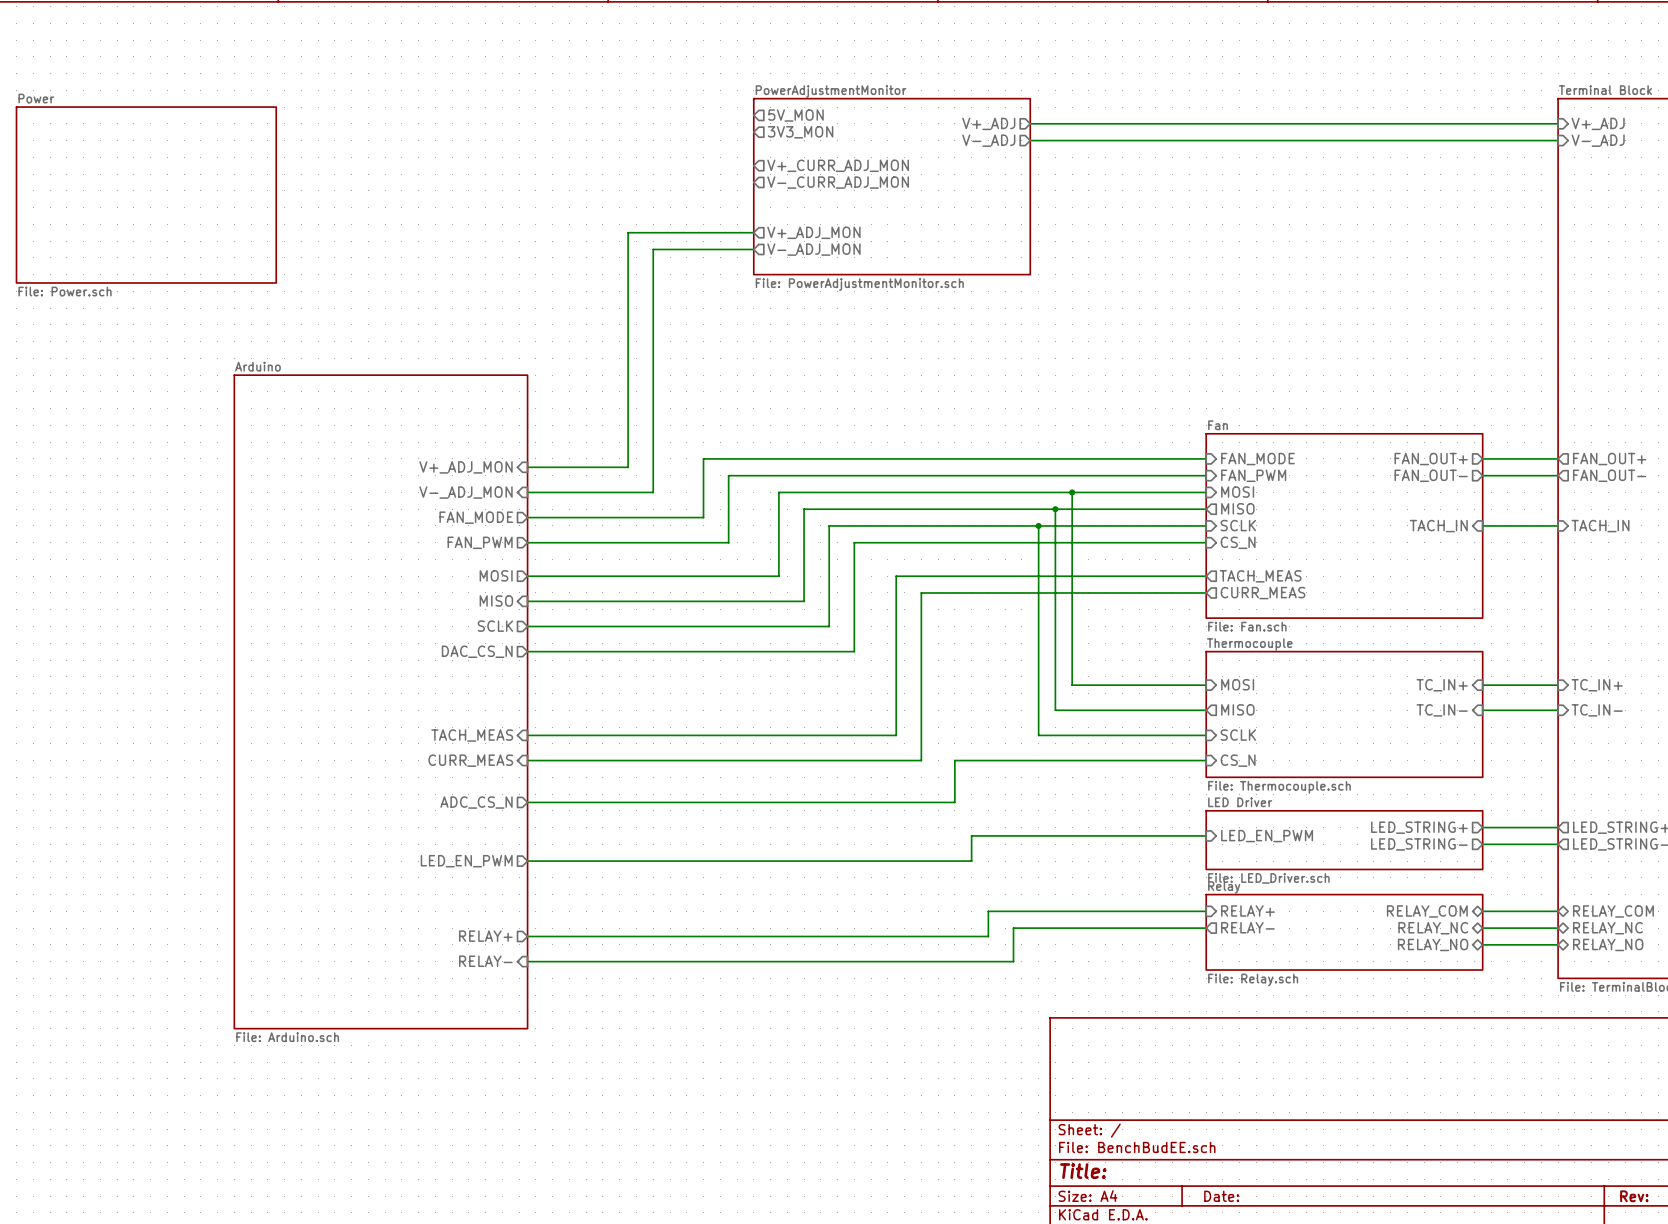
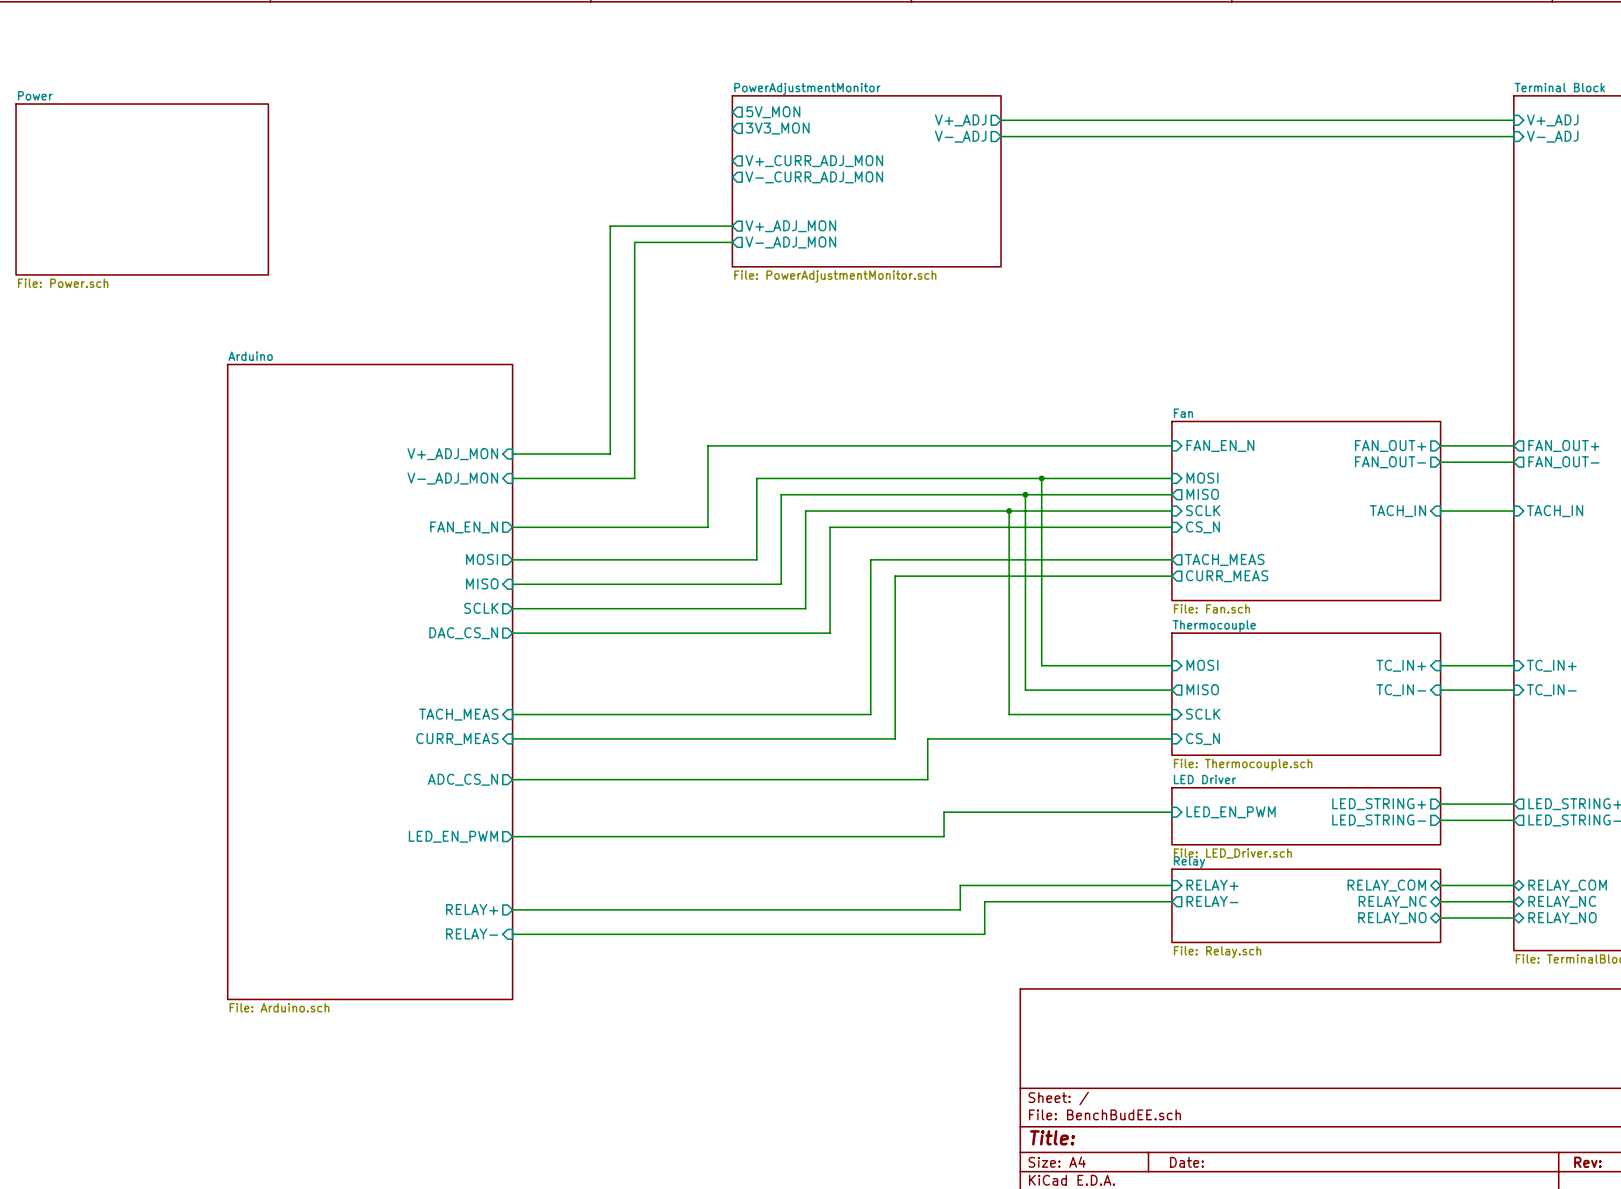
wire: (728, 458) (703, 458) (703, 517) (527, 517) -> (707, 445) (707, 462)
sheet pin: FAN_MODE (1257, 459) -> FAN_EN_N (1220, 446)
wire: (728, 475) (1206, 475) -> none
sheet pin: FAN_PWM (1253, 475) -> none
sheet pin: FAN_MODE (476, 517) -> none
sheet pin: FAN_PWM (480, 542) -> FAN_EN_N (464, 527)

